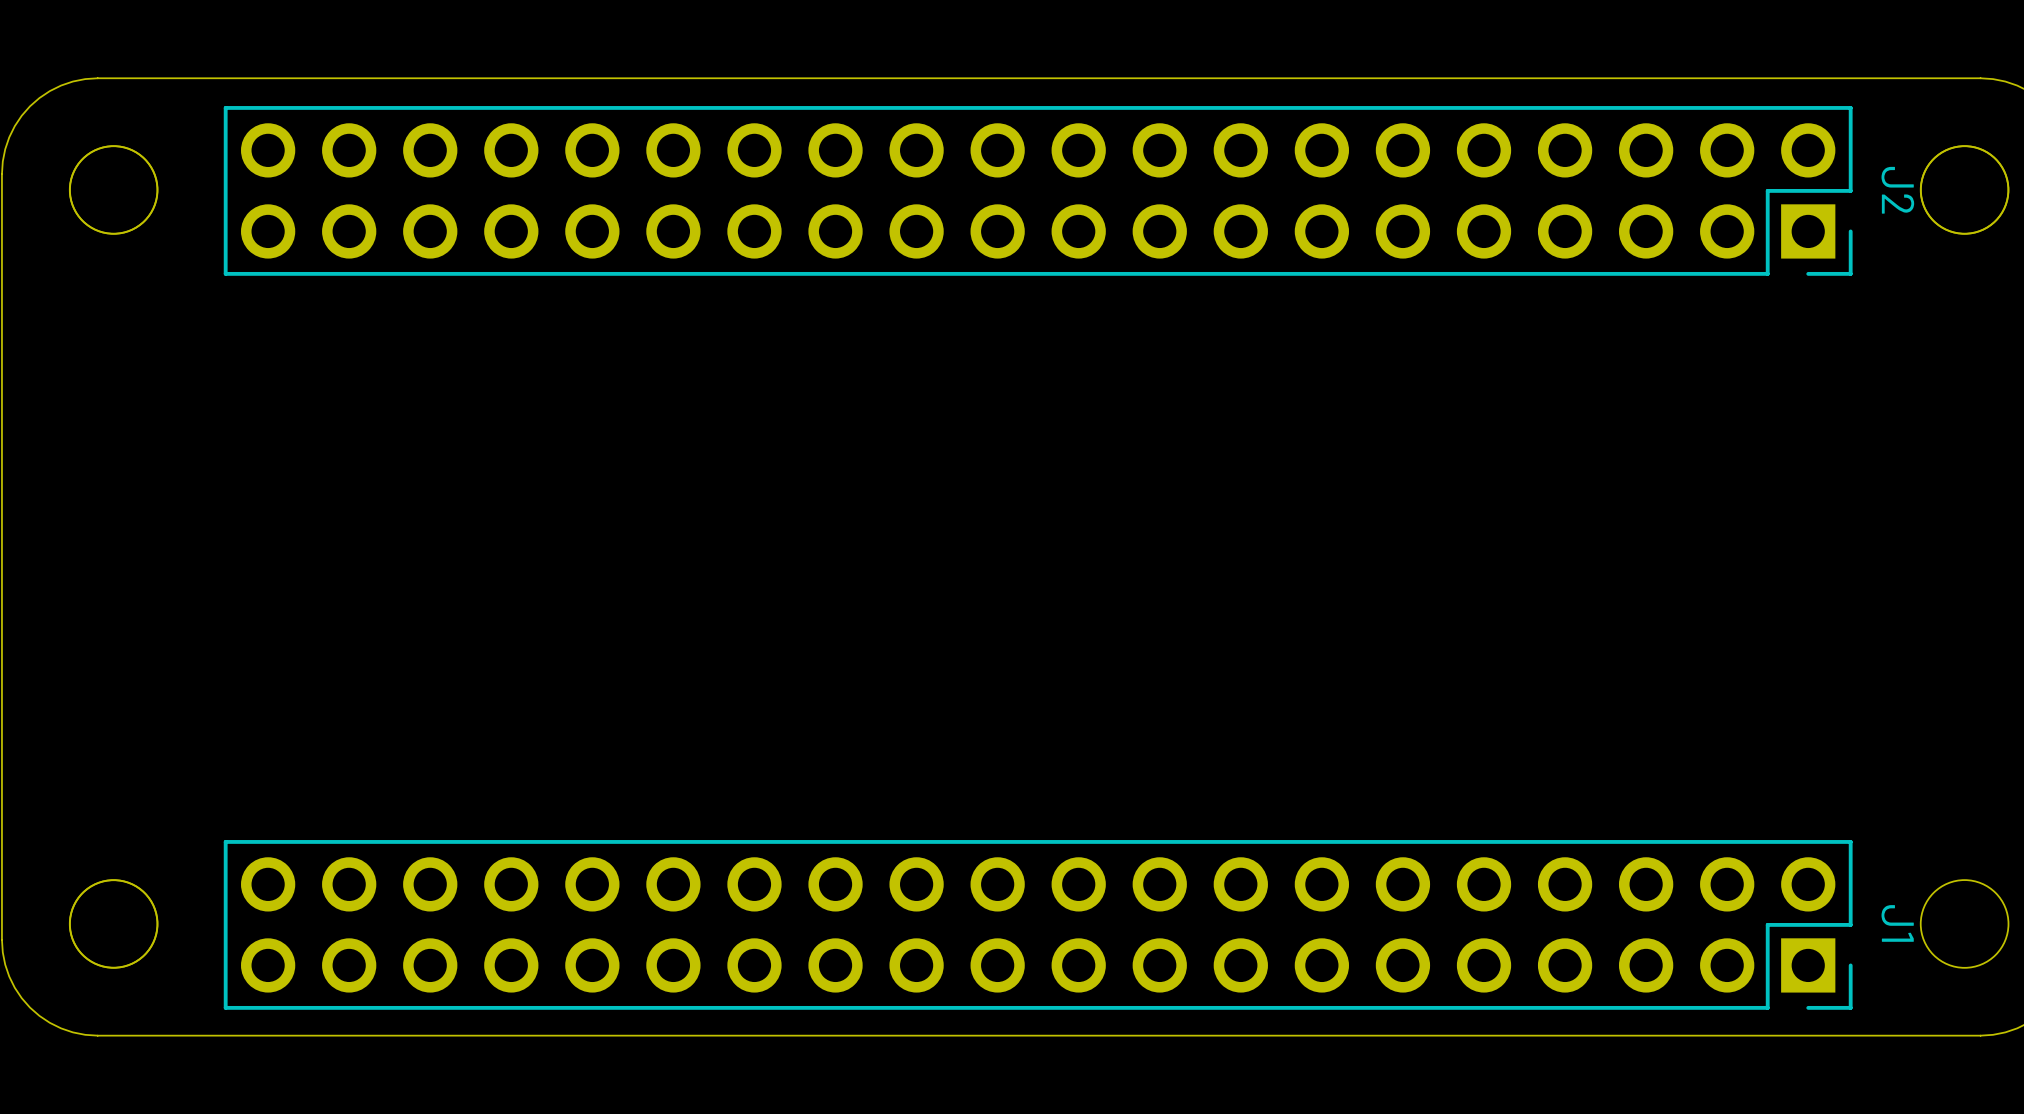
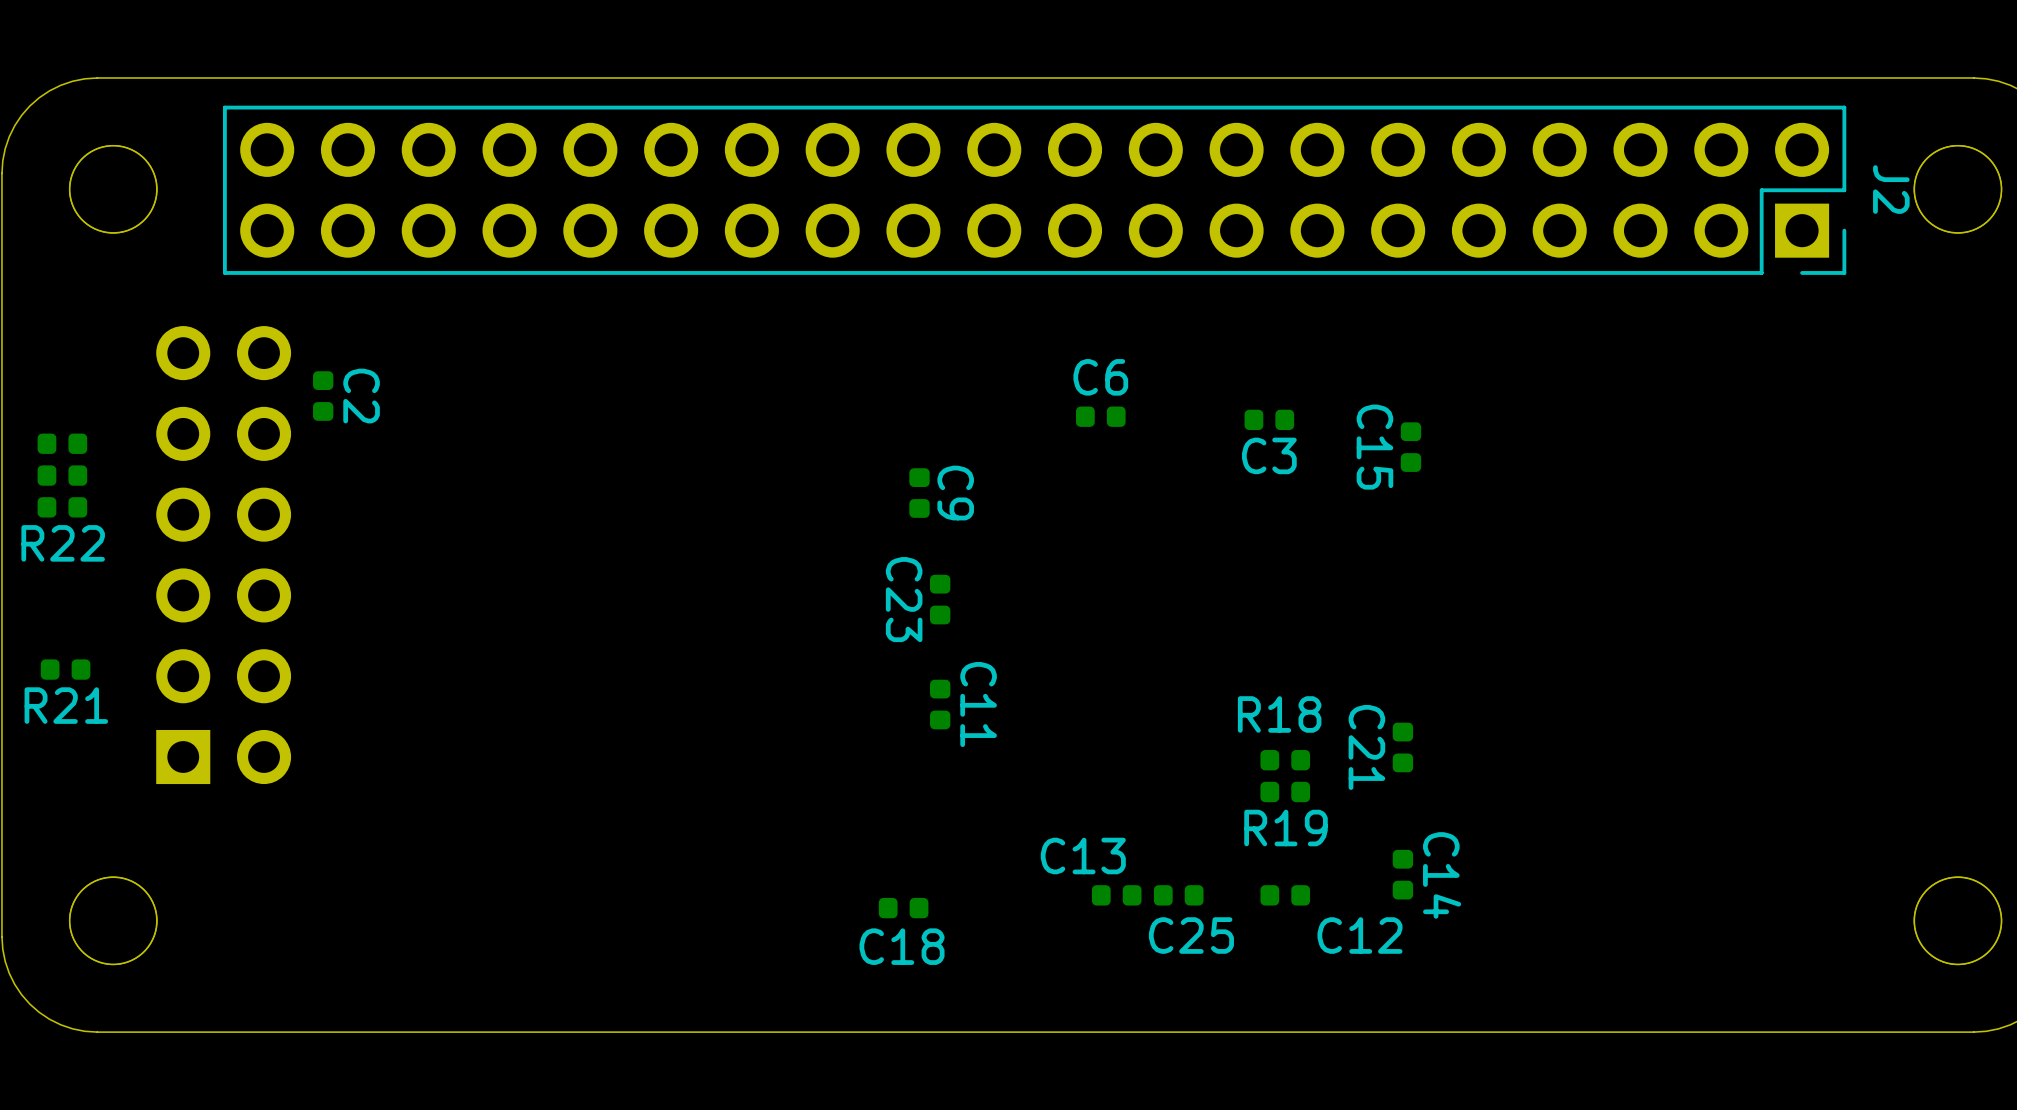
C2: none -> (323, 396)
C6: none -> (1100, 416)
C3: none -> (1269, 419)
part: none -> (62, 443)
C15: none -> (1410, 447)
part: none -> (62, 475)
C9: none -> (919, 493)
R22: none -> (62, 507)
part: none -> (223, 555)
C23: none -> (940, 599)
R21: none -> (65, 669)
C11: none -> (940, 704)
C21: none -> (1402, 747)
R18: none -> (1285, 760)
R19: none -> (1285, 791)
C14: none -> (1402, 874)
round board edge: none -> [1913, 876, 2003, 966]
C13: none -> (1116, 895)
C25: none -> (1178, 895)
C12: none -> (1285, 895)
C18: none -> (903, 908)
J1: (1038, 924) -> none

